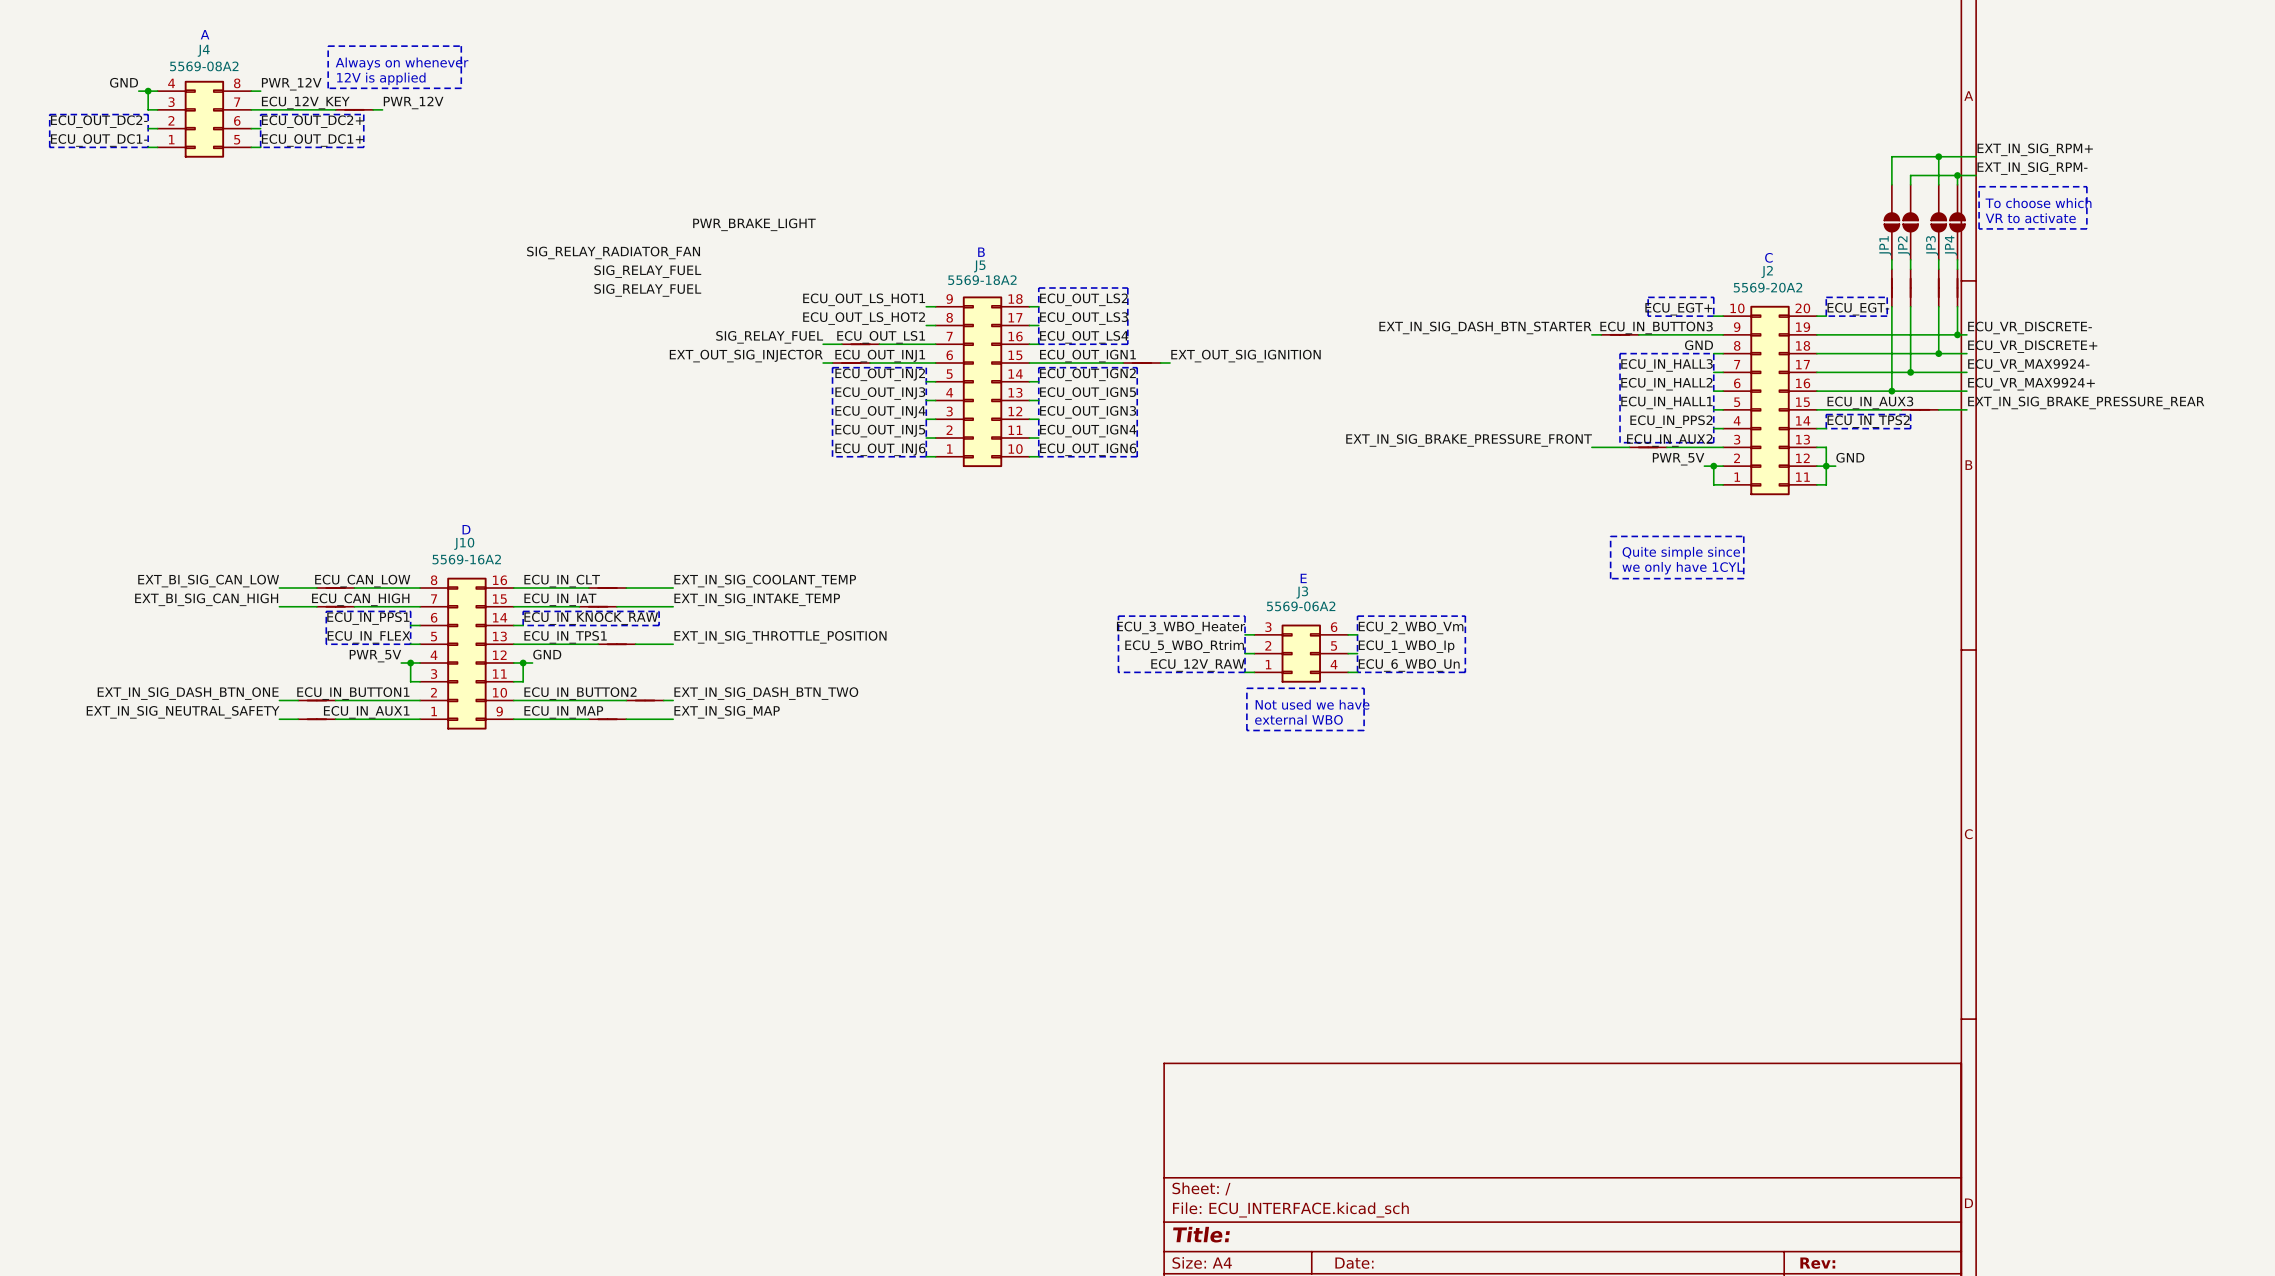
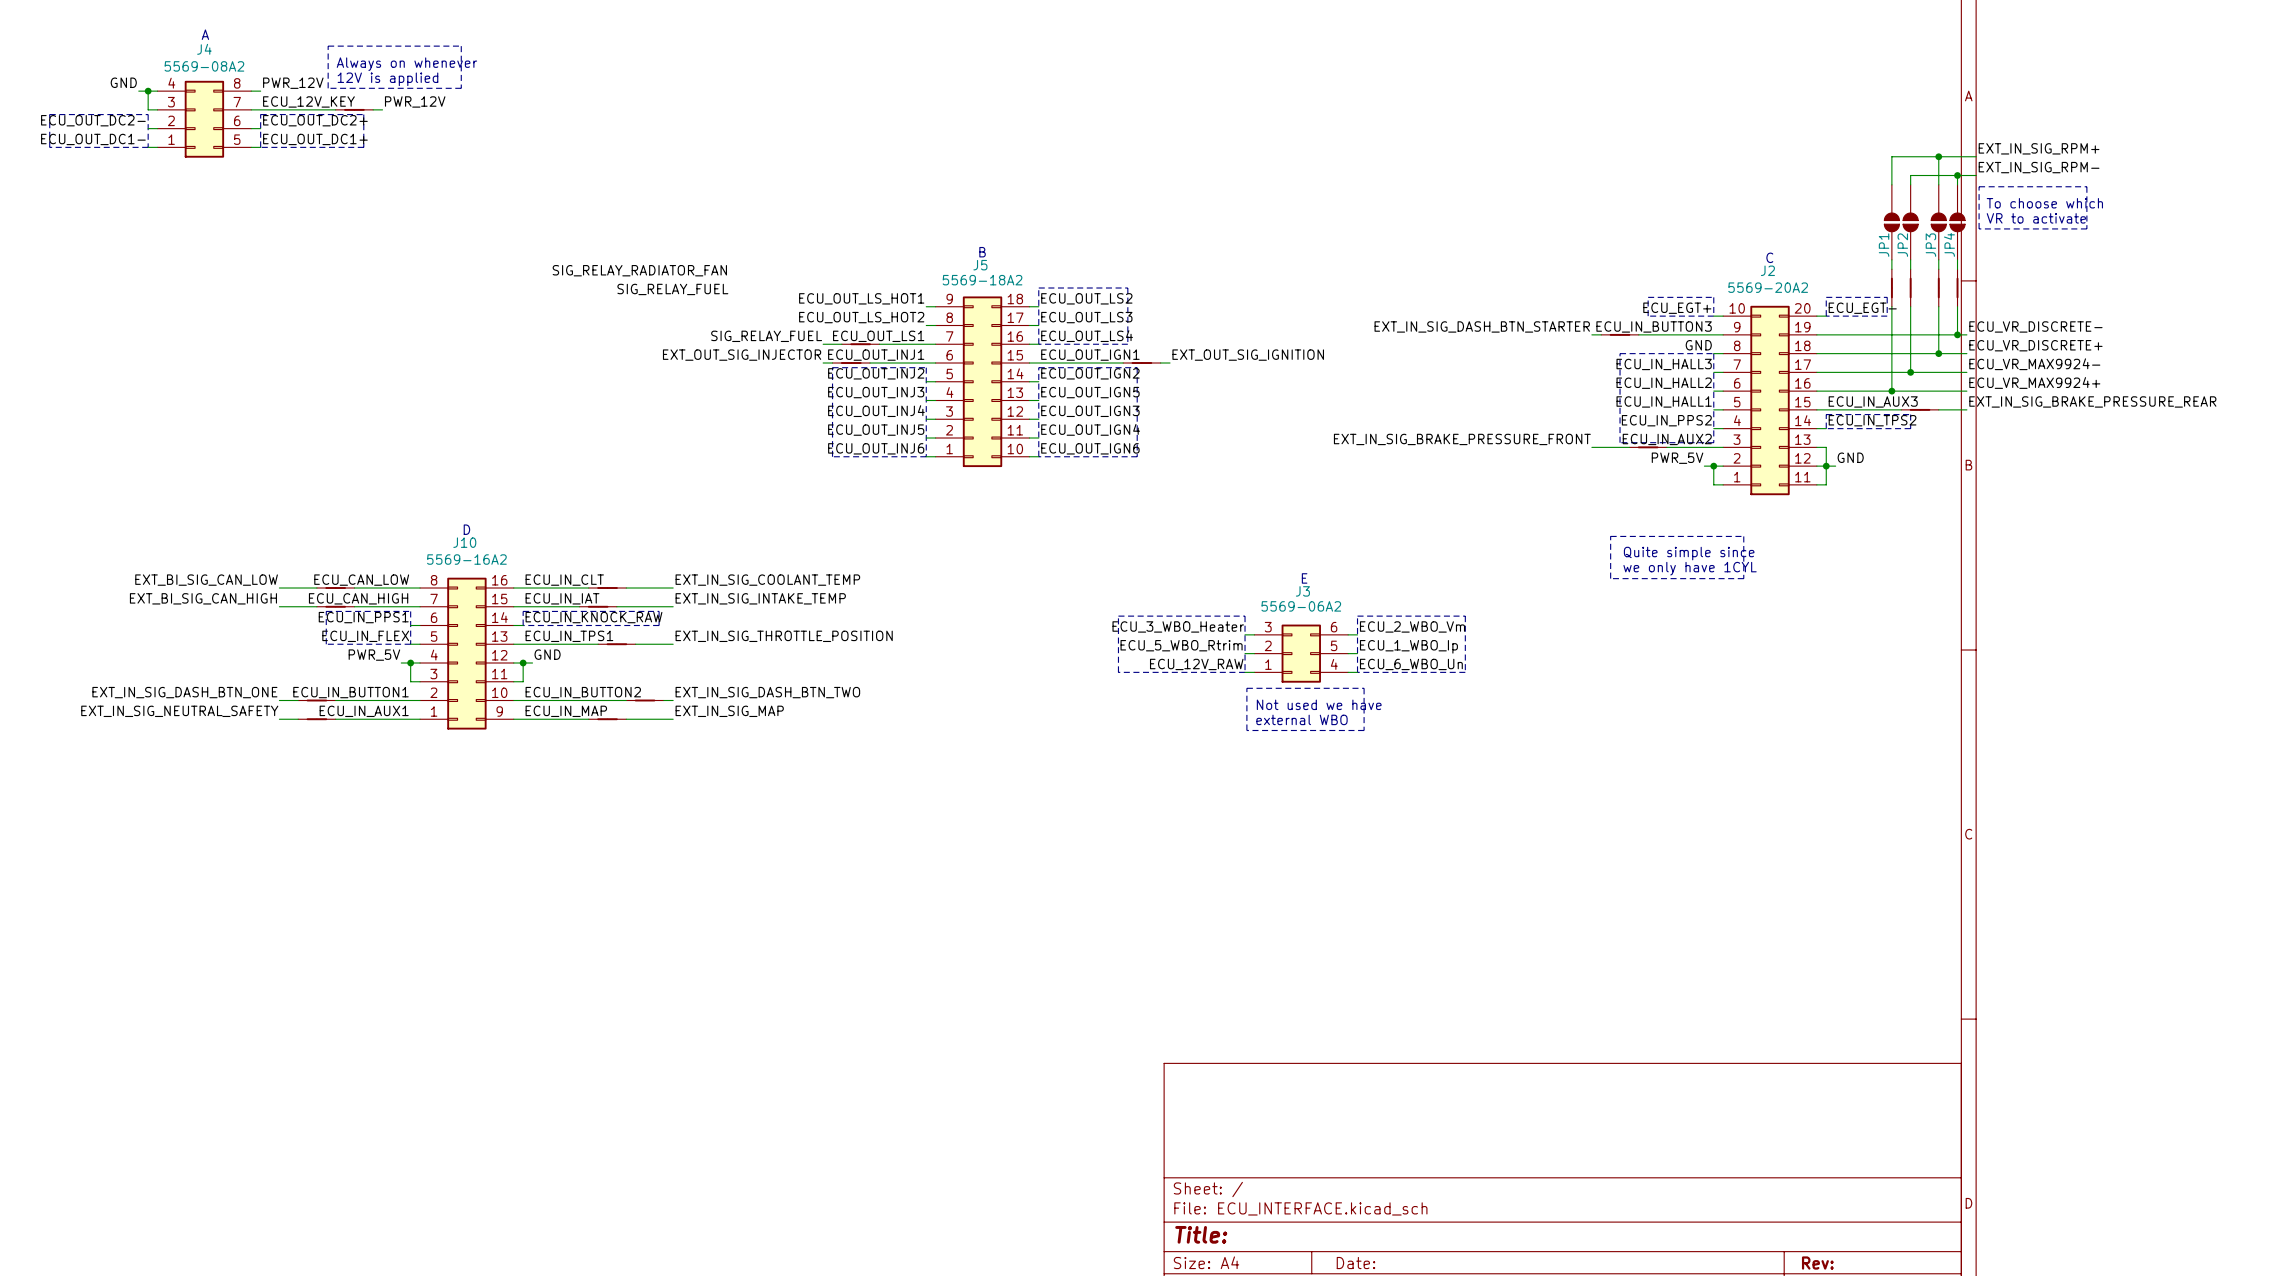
label: PWR_BRAKE_LIGHT (754, 224) -> none
label position: SIG_RELAY_RADIATOR_FAN (613, 252) -> SIG_RELAY_RADIATOR_FAN (639, 270)
label: SIG_RELAY_FUEL (647, 271) -> none
label: SIG_RELAY_FUEL (647, 290) -> none
label: none -> SIG_RELAY_FUEL (672, 289)

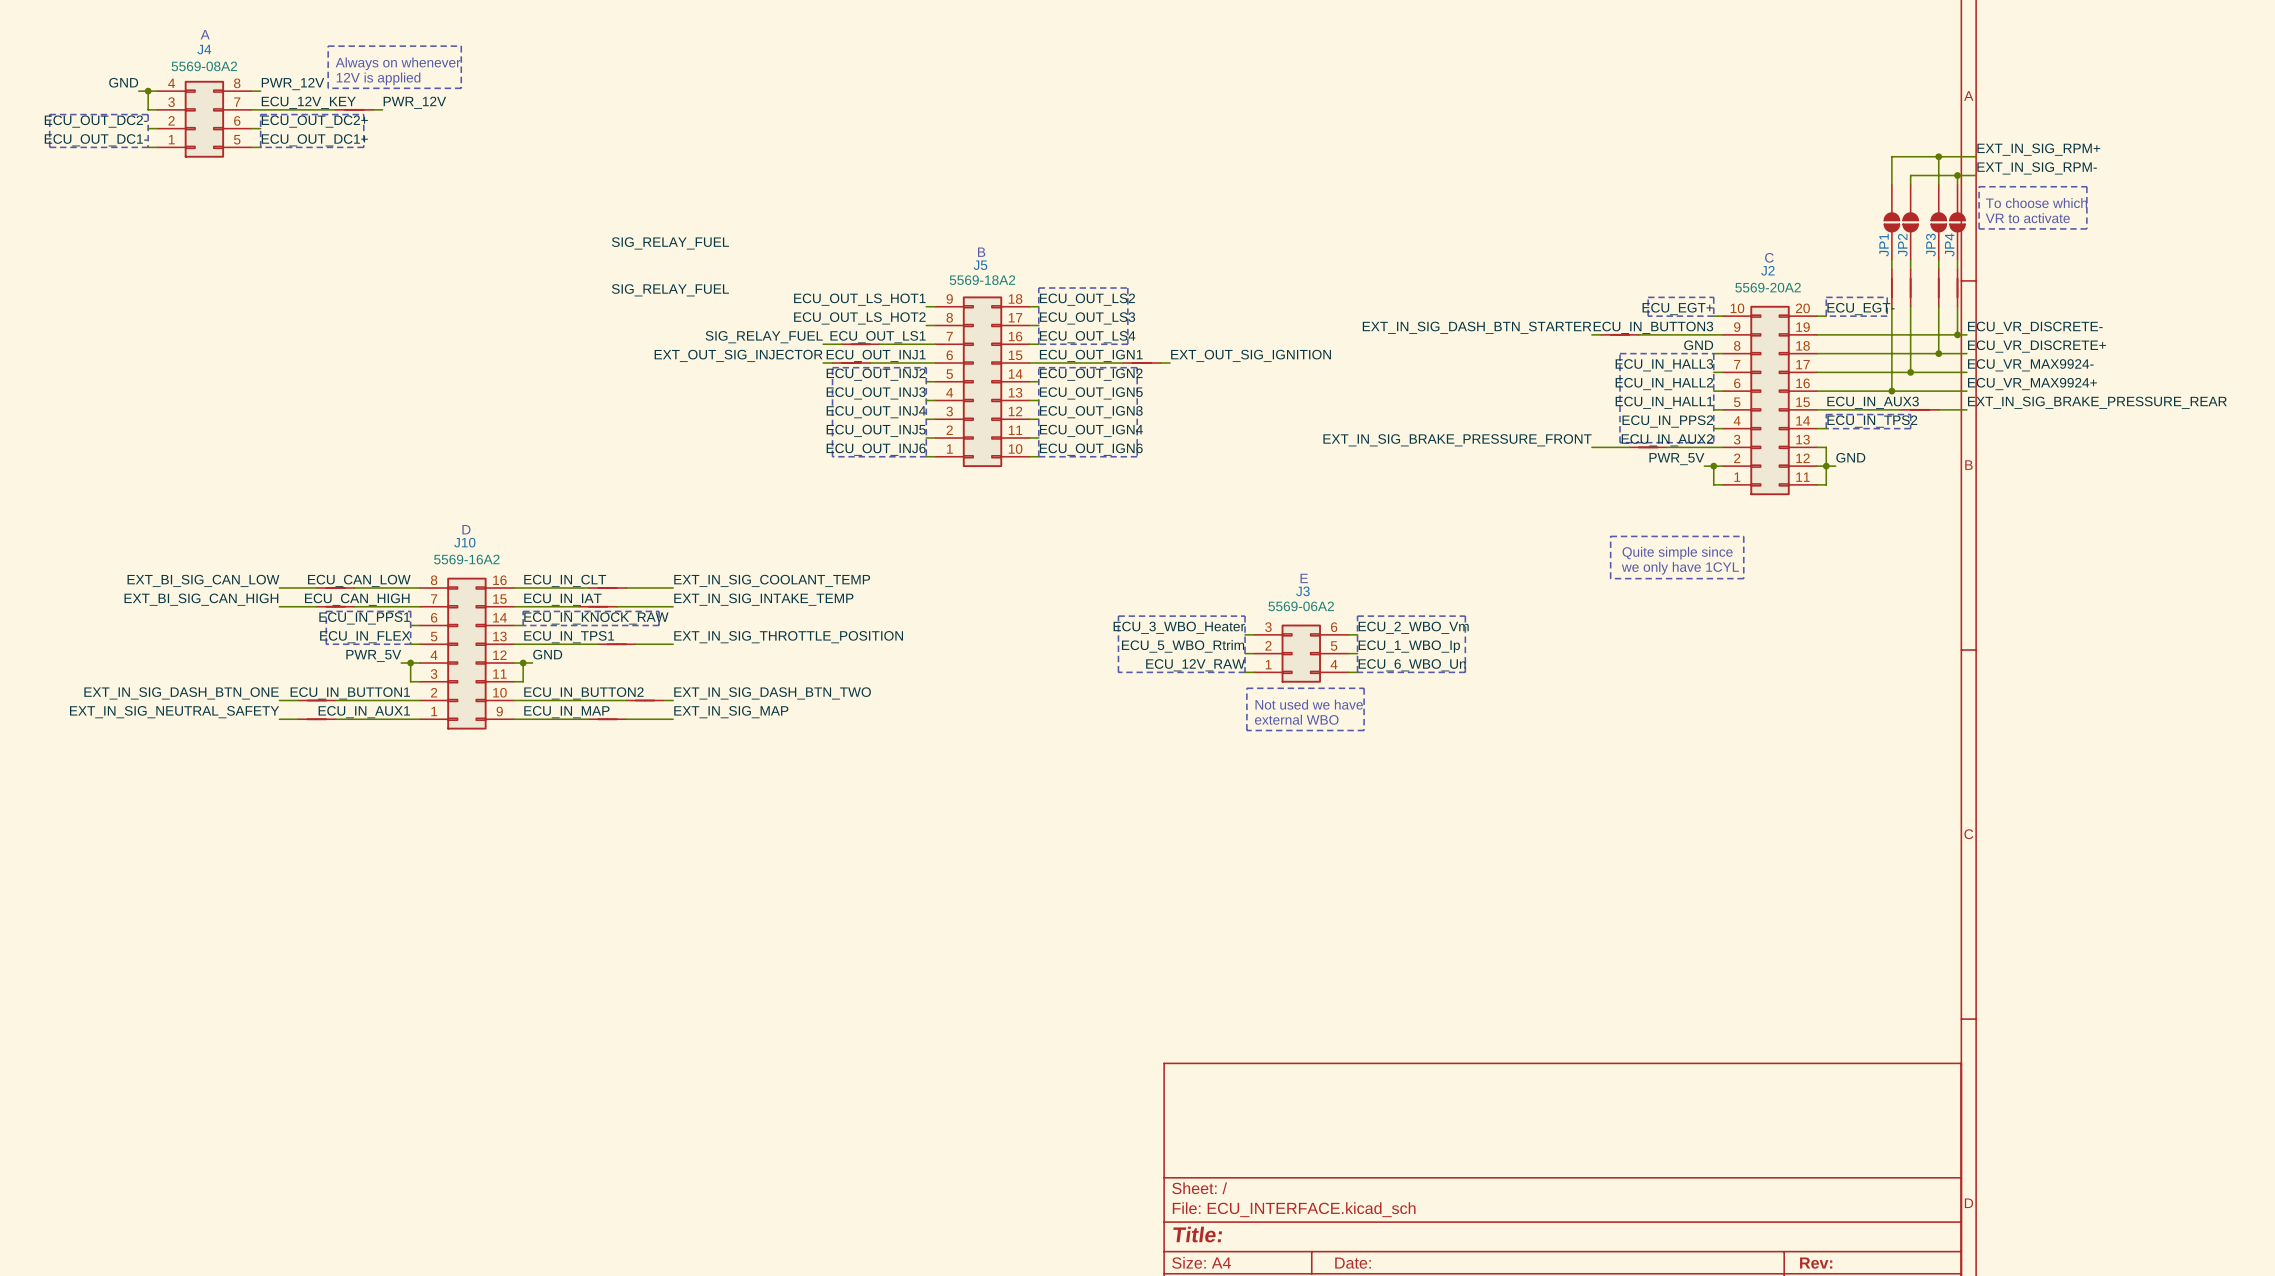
label: none -> SIG_RELAY_FUEL (670, 243)
label: SIG_RELAY_RADIATOR_FAN (639, 270) -> none

